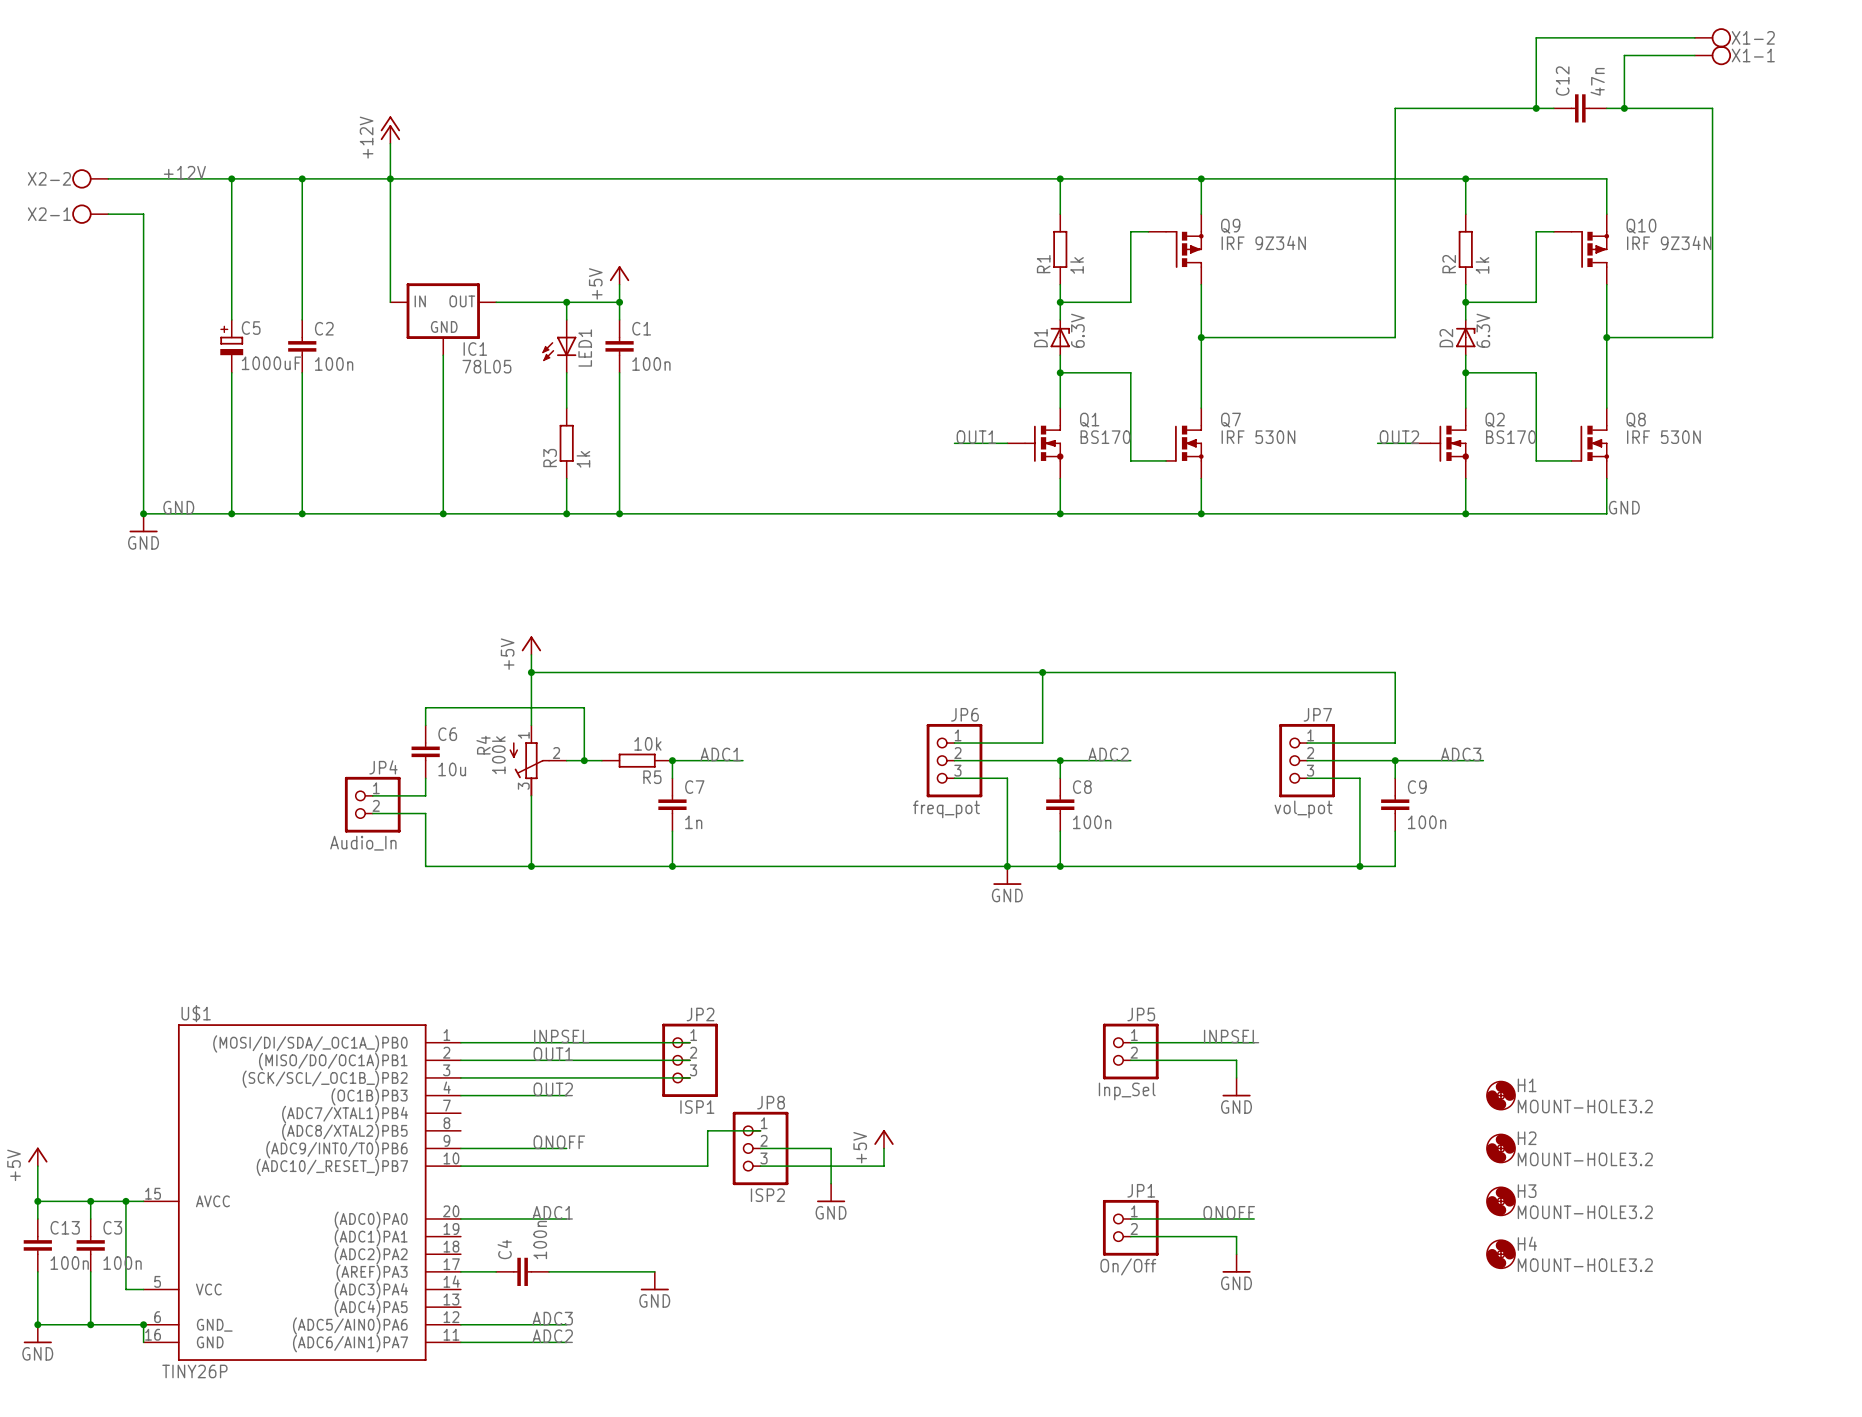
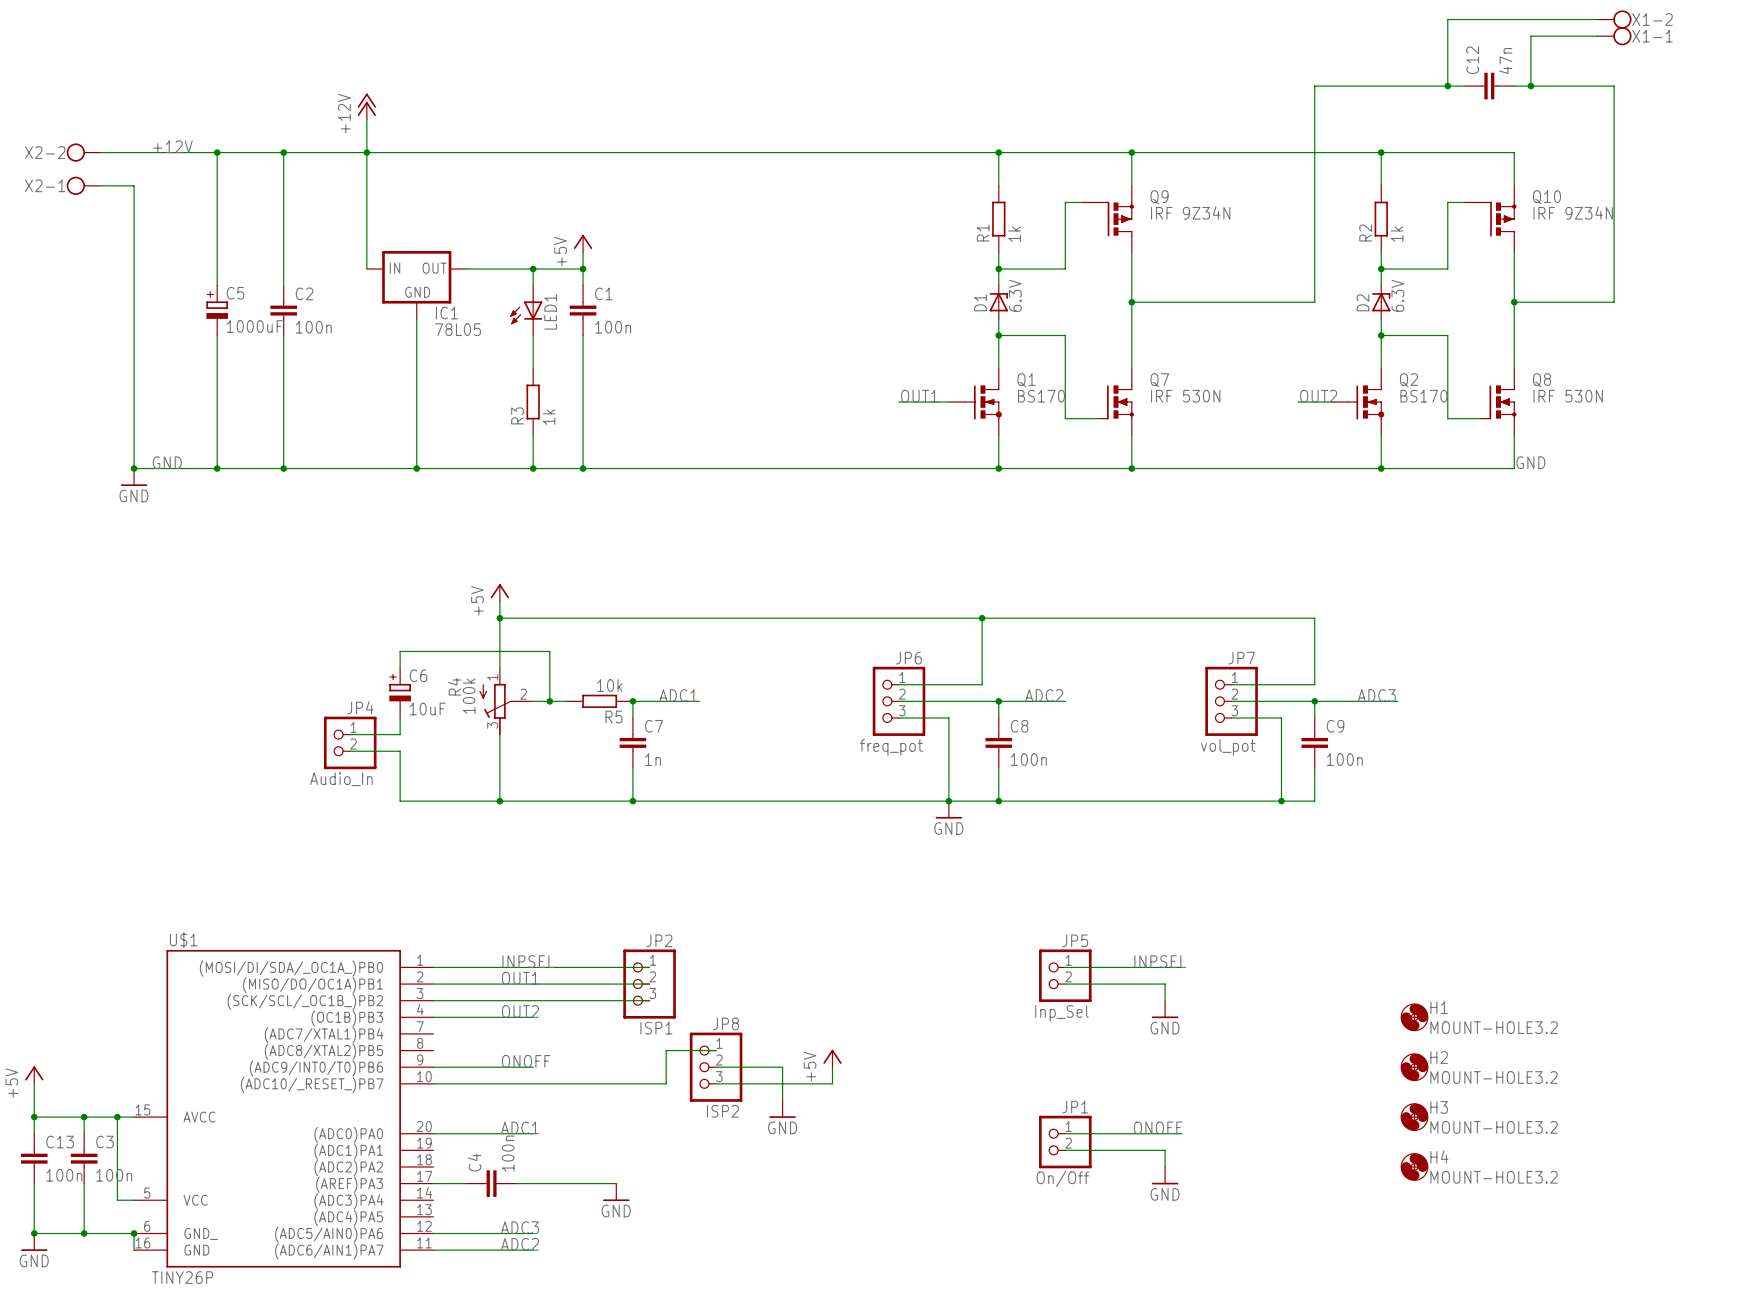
C6 symbol: [411, 725, 440, 779] -> [389, 668, 411, 718]
C6 value: 10u (452, 769) -> 10uF (427, 709)

